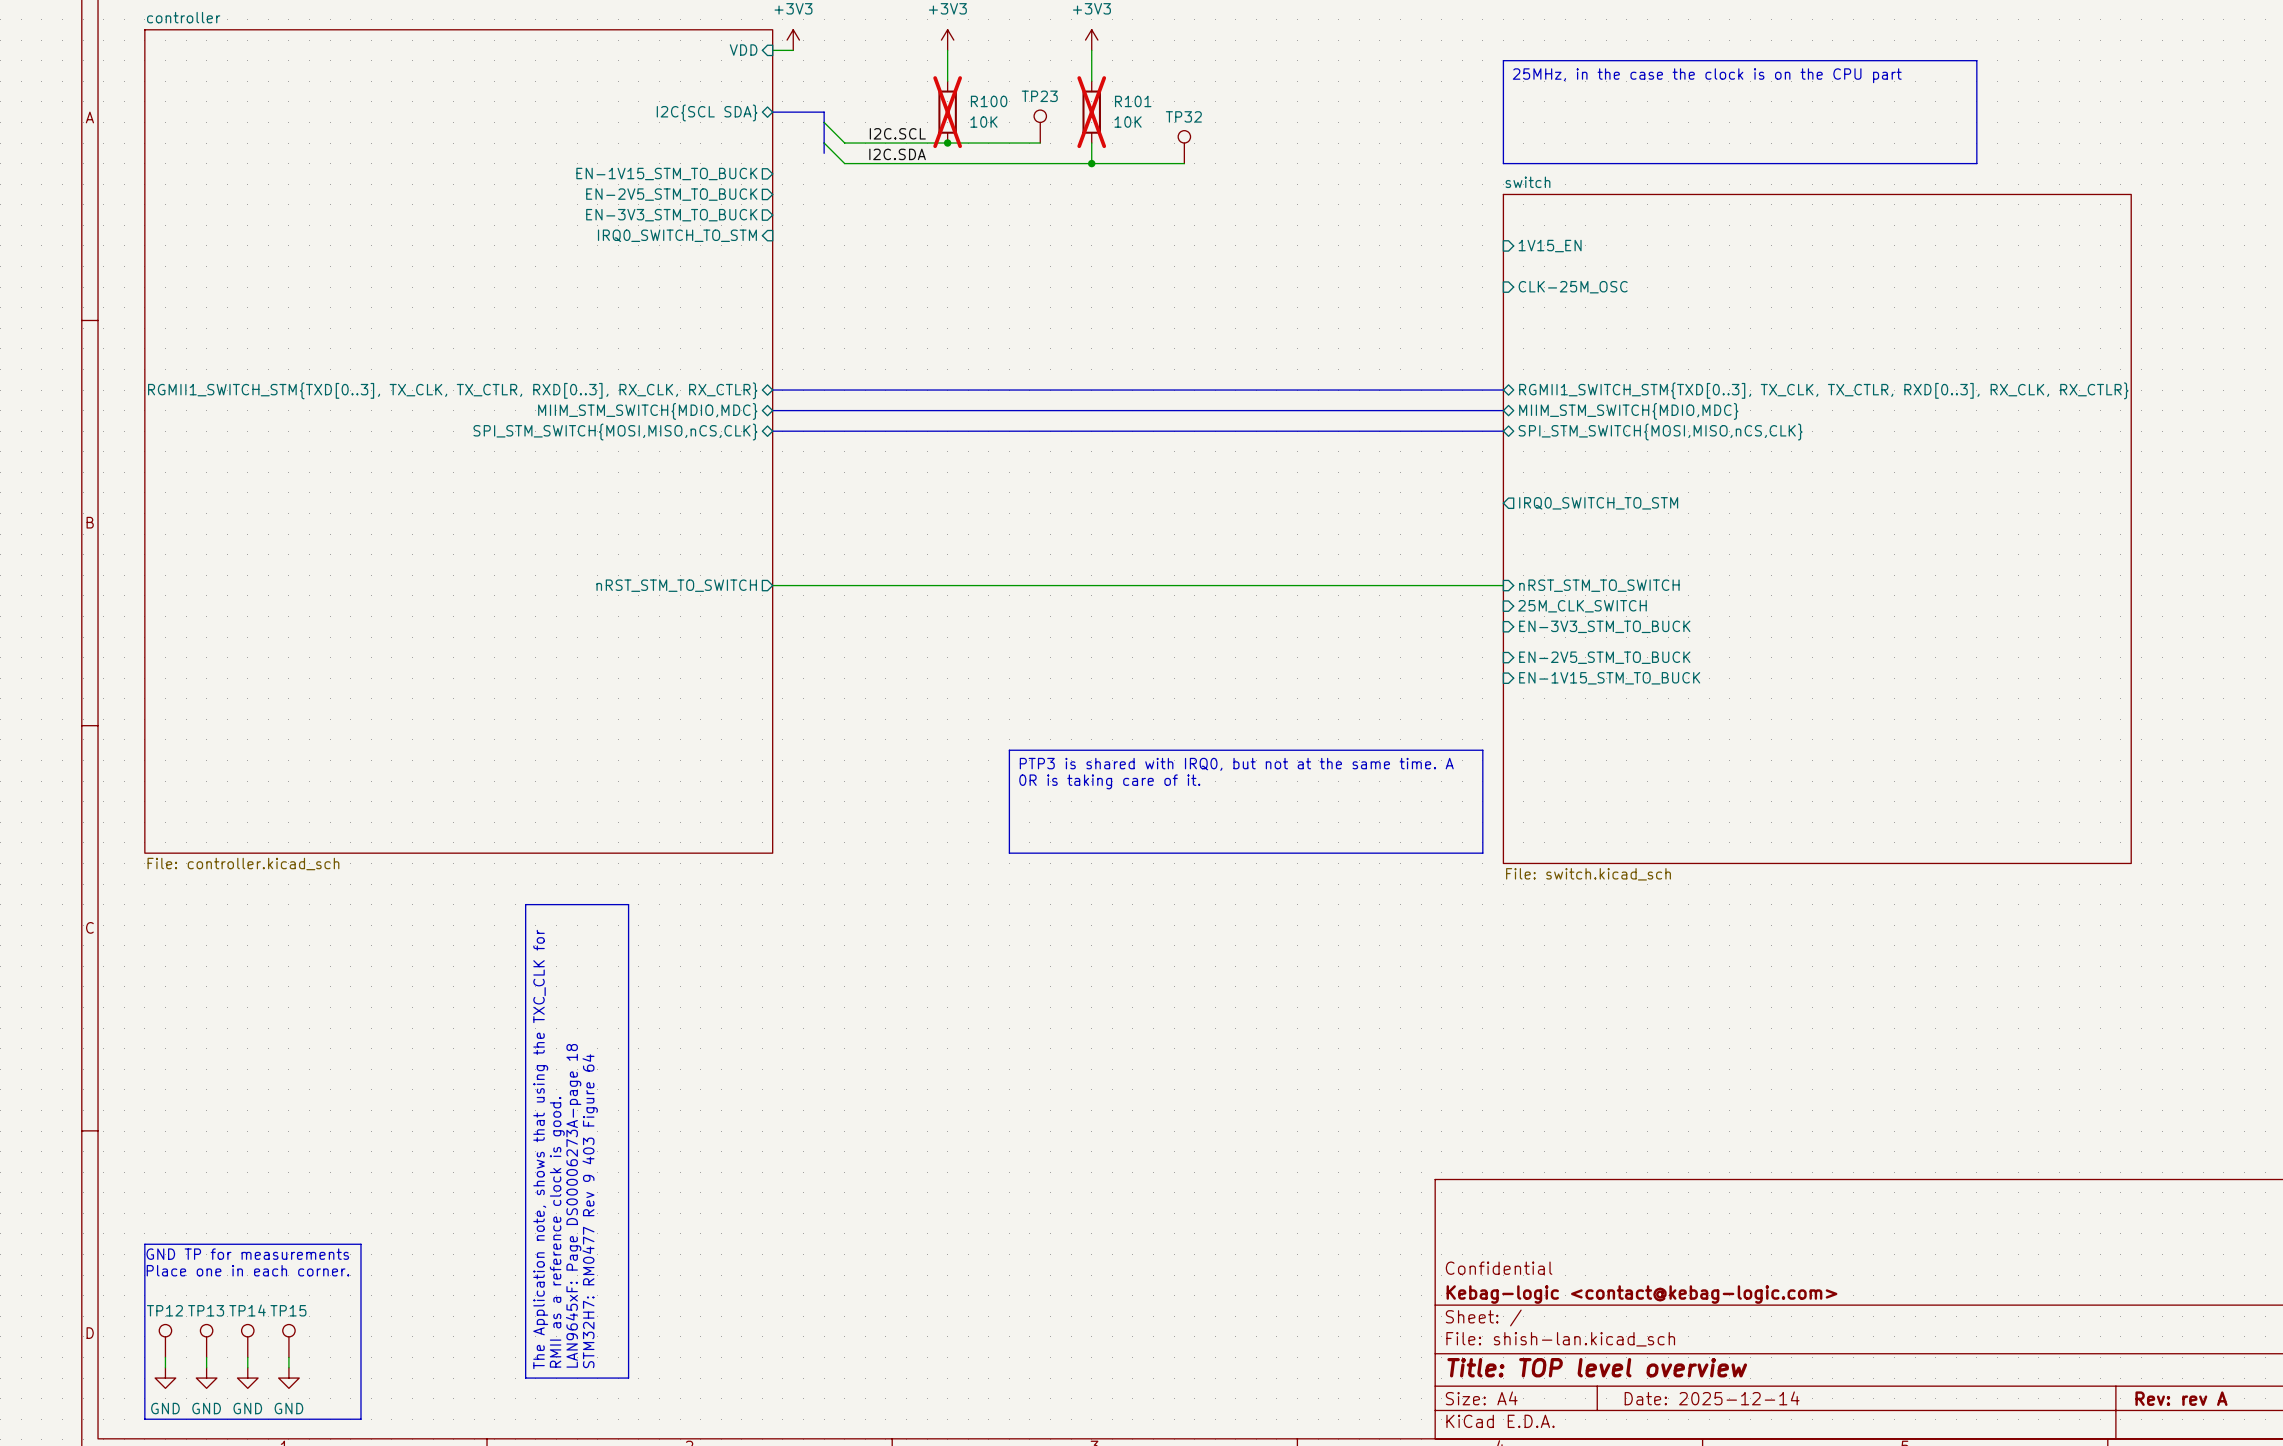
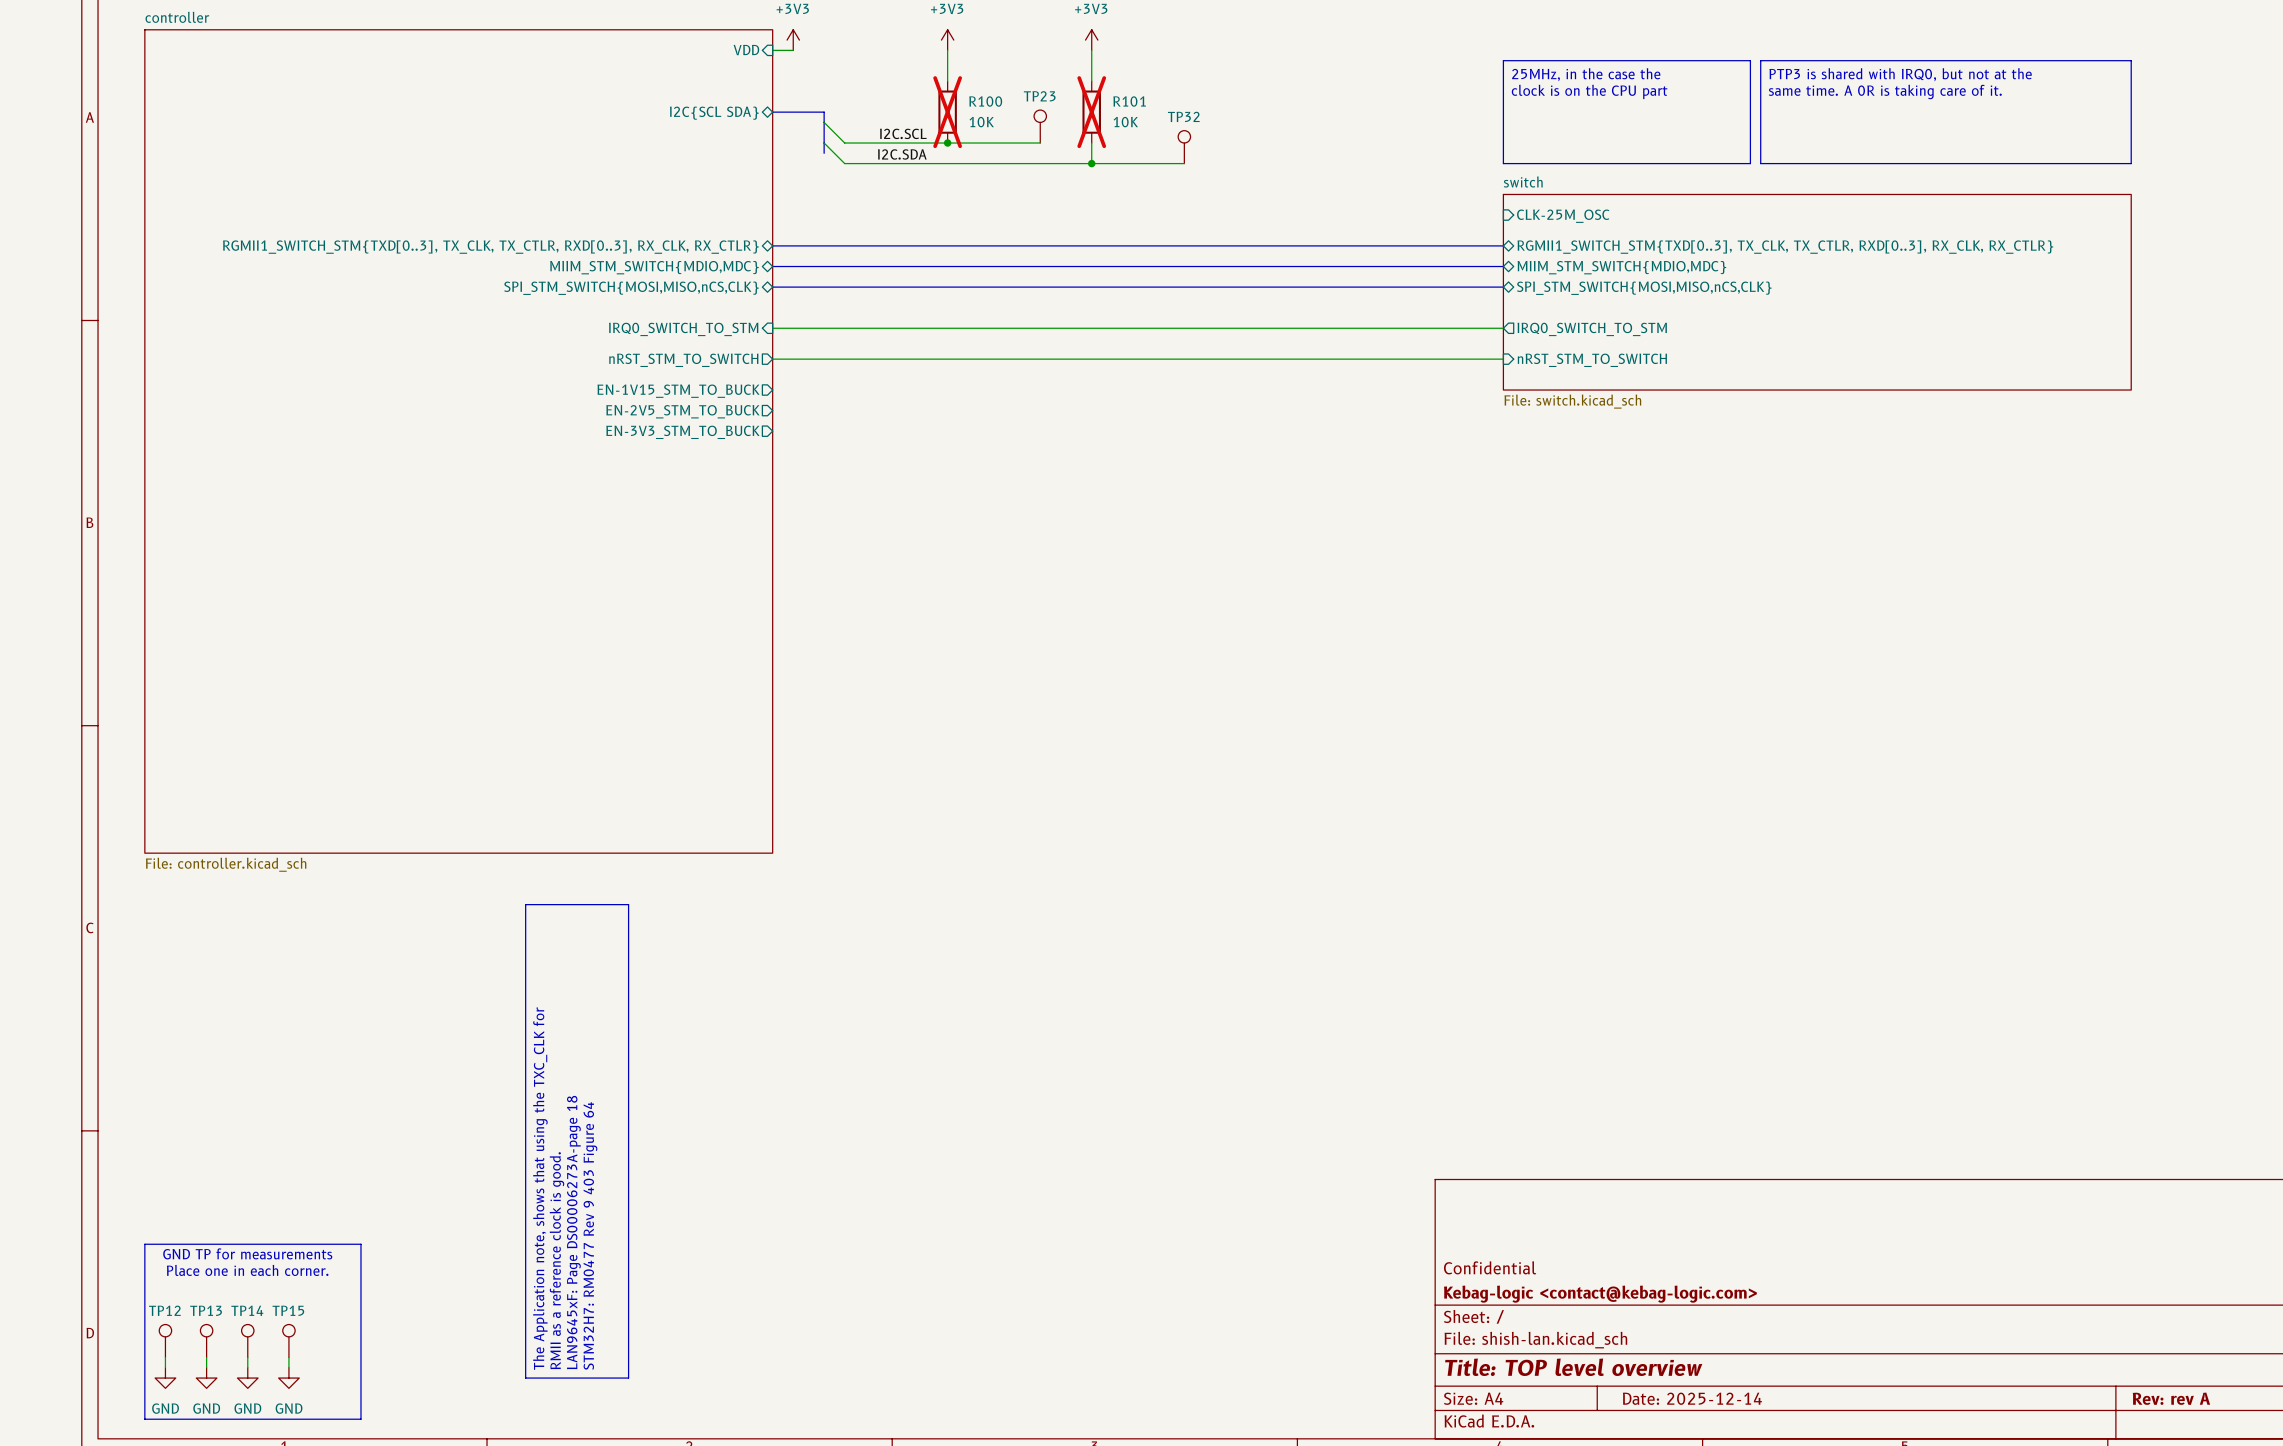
line: (1750, 60) (1760, 60) -> (1750, 60) (1750, 163)
line: (1976, 60) (1976, 163) -> (1976, 60) (2131, 60) (2131, 163) (1976, 163)
text: none -> PTP3 is shared with IRQ0, but not at the (1900, 74)
text: 25MHz, in the case the clock is on the CPU part (1707, 75) -> 25MHz, in the case the (1586, 74)
text: none -> clock is on the CPU part (1589, 91)
text: none -> same time. A 0R is taking care of it. (1885, 92)
line: (1750, 163) (1760, 163) -> (1760, 60) (1760, 163)
sheet pin: EN-1V15_STM_TO_BUCK (666, 173) -> none
sheet pin: EN-2V5_STM_TO_BUCK (671, 194) -> none
sheet pin: EN-3V3_STM_TO_BUCK (671, 215) -> none
sheet pin: none -> CLK-25M_OSC (1563, 216)
sheet pin position: IRQ0_SWITCH_TO_STM (677, 235) -> IRQ0_SWITCH_TO_STM (683, 329)
sheet pin: none -> RGMII1_SWITCH_STM{TXD[0..3], TX_CLK, TX_CTLR, RXD[0..3], RX_CLK, RX_CTLR} (490, 247)
sheet pin shape: input (1550, 246) -> bidirectional (1785, 247)
sheet pin: 1V15_EN (1550, 246) -> RGMII1_SWITCH_STM{TXD[0..3], TX_CLK, TX_CTLR, RXD[0..3], RX_CLK, RX_CTLR} (1785, 247)
sheet pin: none -> MIIM_STM_SWITCH{MDIO,MDC} (654, 267)
sheet pin: none -> SPI_STM_SWITCH{MOSI,MISO,nCS,CLK} (631, 288)
sheet pin shape: input (1573, 287) -> bidirectional (1644, 288)
sheet pin: CLK-25M_OSC (1573, 287) -> SPI_STM_SWITCH{MOSI,MISO,nCS,CLK} (1644, 288)
sheet switch: none -> File: switch.kicad_sch (1817, 292)
wire: none -> (772, 328) (1503, 328)
sheet pin: none -> nRST_STM_TO_SWITCH (683, 360)
wire: none -> (772, 359) (1503, 359)
sheet pin: none -> nRST_STM_TO_SWITCH (1592, 360)
sheet pin shape: bidirectional (452, 390) -> output (678, 391)
sheet pin: RGMII1_SWITCH_STM{TXD[0..3], TX_CLK, TX_CTLR, RXD[0..3], RX_CLK, RX_CTLR} (452, 390) -> EN-1V15_STM_TO_BUCK (678, 391)
bus: (772, 390) (1503, 390) -> (772, 245) (1503, 245)
sheet pin: RGMII1_SWITCH_STM{TXD[0..3], TX_CLK, TX_CTLR, RXD[0..3], RX_CLK, RX_CTLR} (1823, 390) -> none
bus: (772, 410) (1503, 410) -> (772, 266) (1503, 266)
sheet pin shape: bidirectional (647, 411) -> output (682, 411)
sheet pin: MIIM_STM_SWITCH{MDIO,MDC} (647, 411) -> EN-2V5_STM_TO_BUCK (682, 411)
sheet pin position: MIIM_STM_SWITCH{MDIO,MDC} (1628, 411) -> MIIM_STM_SWITCH{MDIO,MDC} (1621, 267)
bus: (772, 431) (1503, 431) -> (772, 287) (1503, 287)
sheet pin shape: bidirectional (615, 432) -> output (682, 432)
sheet pin: SPI_STM_SWITCH{MOSI,MISO,nCS,CLK} (615, 432) -> EN-3V3_STM_TO_BUCK (682, 432)
sheet pin: SPI_STM_SWITCH{MOSI,MISO,nCS,CLK} (1660, 432) -> none
sheet pin position: IRQ0_SWITCH_TO_STM (1598, 503) -> IRQ0_SWITCH_TO_STM (1592, 329)
sheet switch: File: switch.kicad_sch (1817, 528) -> none
sheet pin: nRST_STM_TO_SWITCH (676, 585) -> none
wire: (772, 585) (1503, 585) -> none
sheet pin: nRST_STM_TO_SWITCH (1599, 585) -> none
sheet pin: 25M_CLK_SWITCH (1582, 606) -> none
sheet pin: EN-3V3_STM_TO_BUCK (1604, 626) -> none
sheet pin: EN-2V5_STM_TO_BUCK (1604, 657) -> none
sheet pin: EN-1V15_STM_TO_BUCK (1609, 678) -> none
line: (1009, 750) (1482, 750) (1482, 853) (1009, 853) (1009, 750) -> none
text: PTP3 is shared with IRQ0, but not at the same time. A (1236, 764) -> none
text: 0R is taking care of it. (1109, 781) -> none

